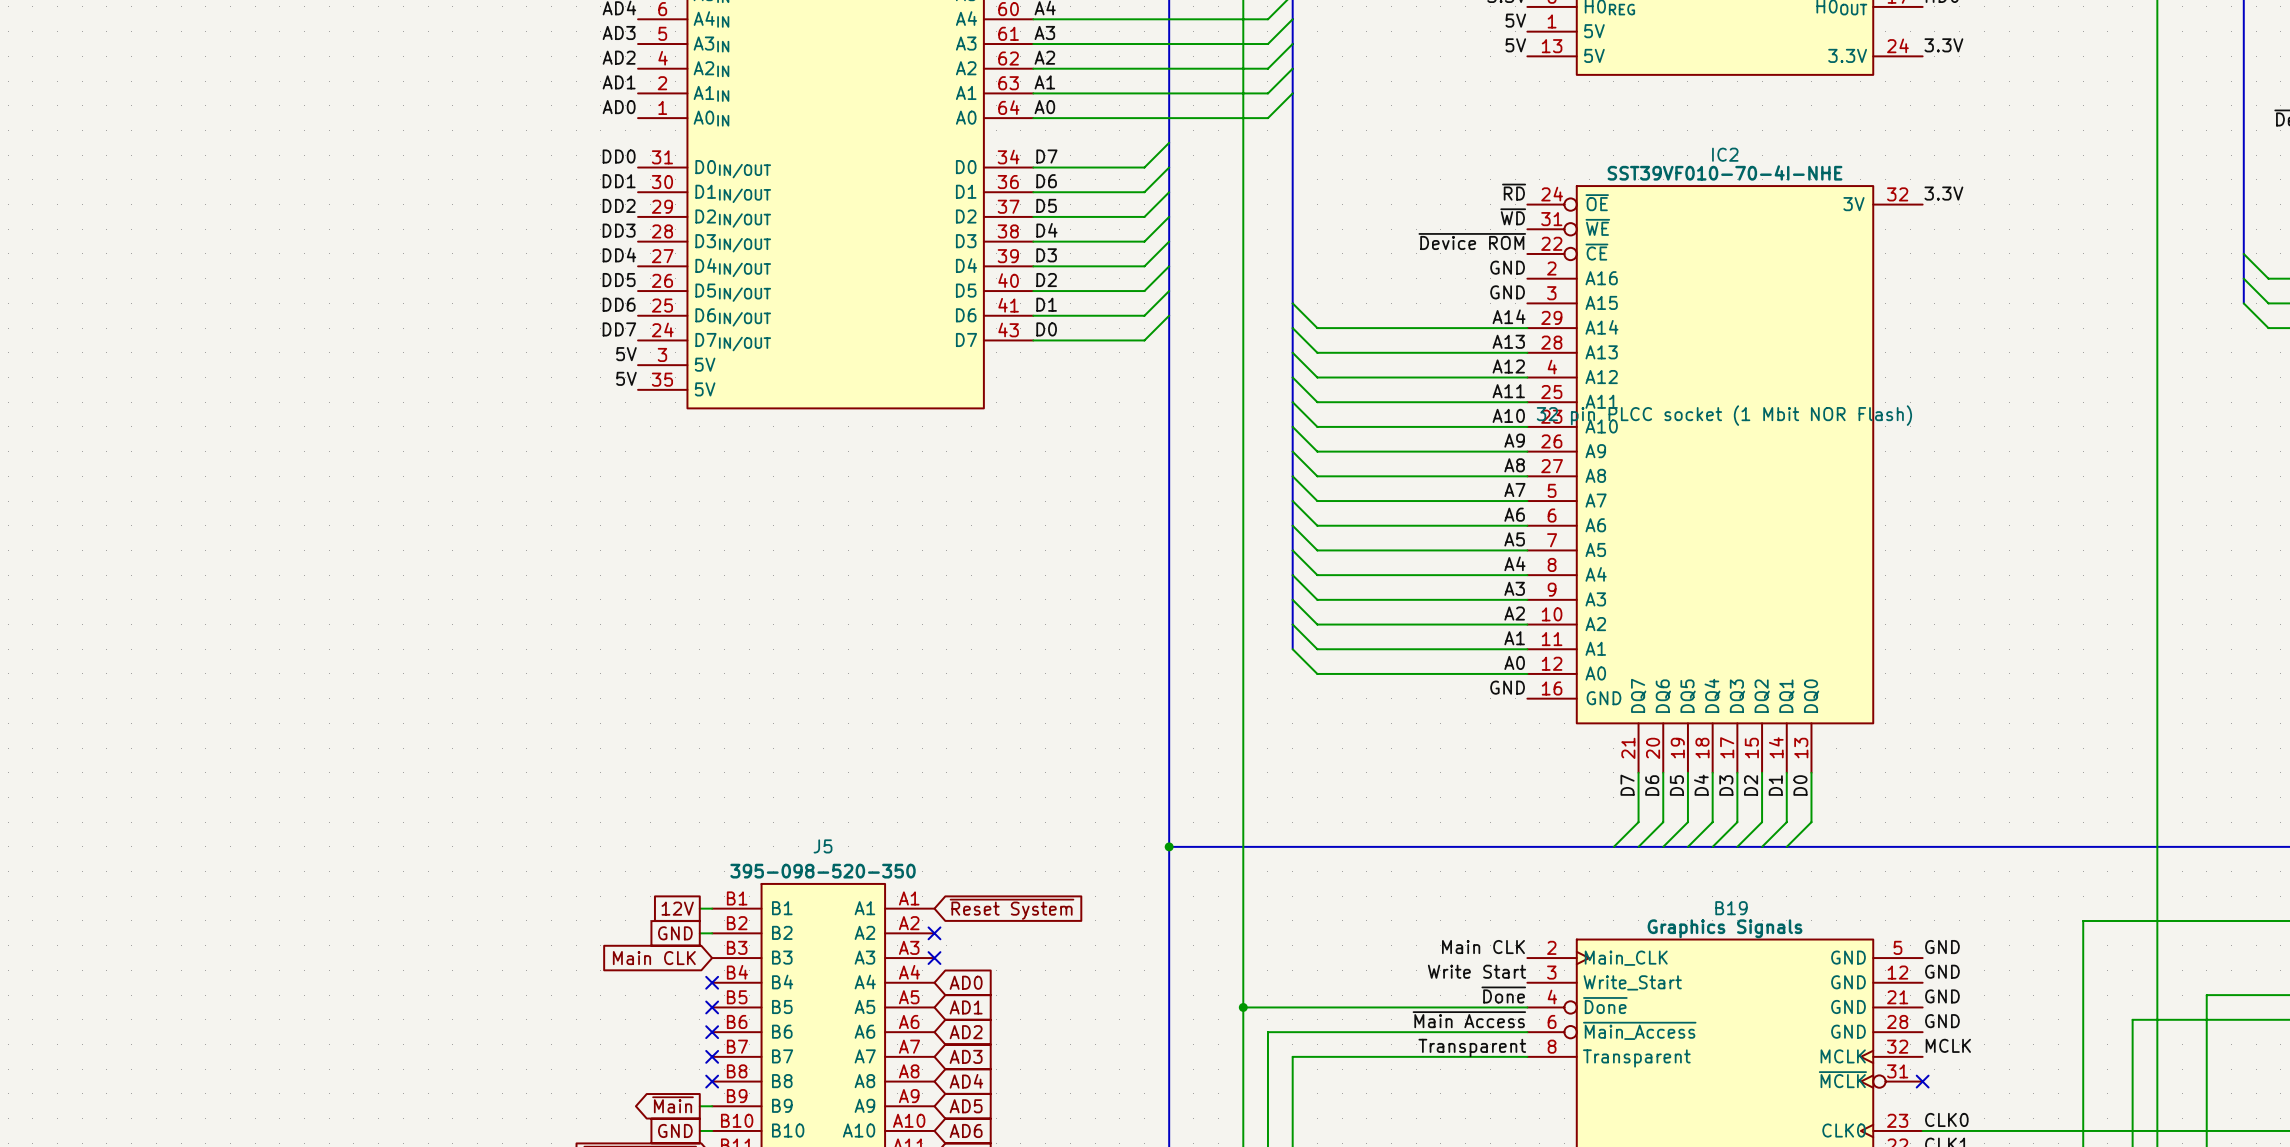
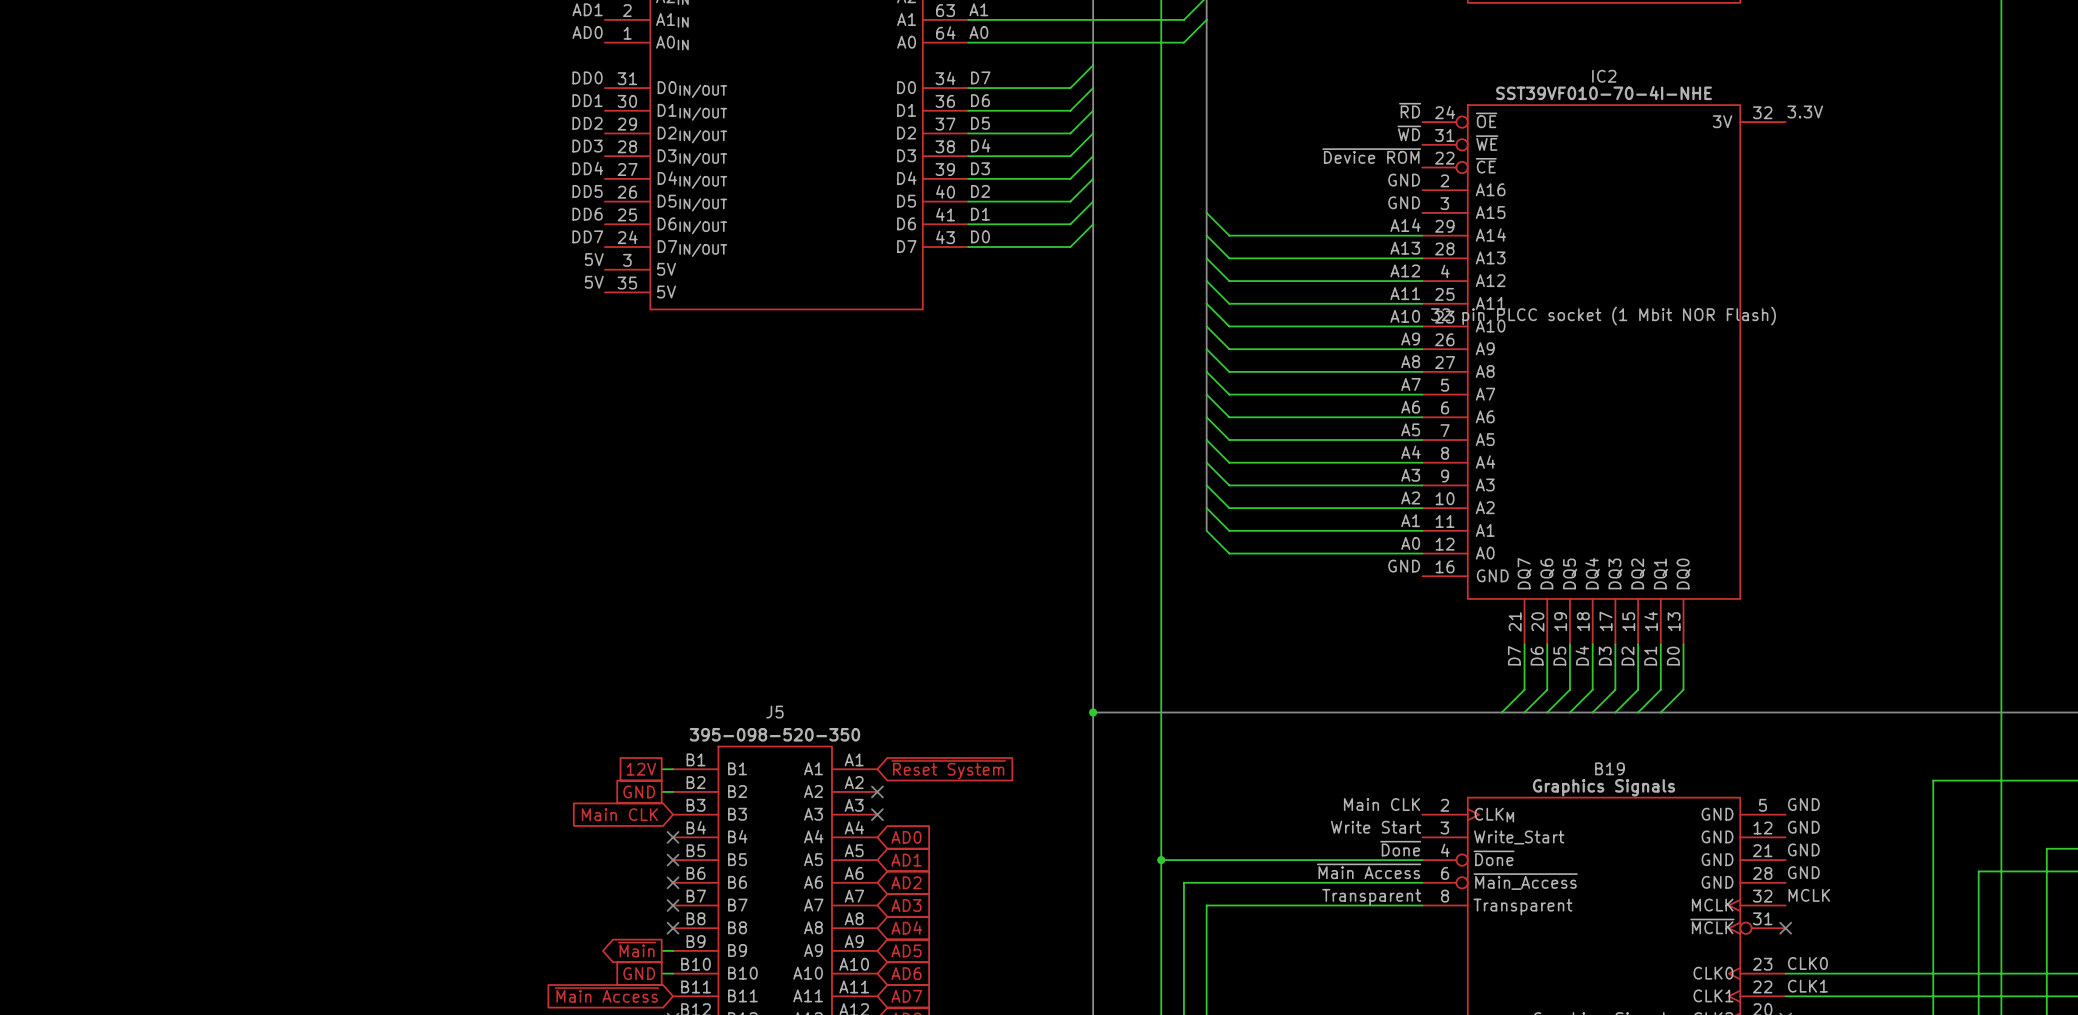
B19 pin name: Main_CLK (1626, 958) -> CLKM (1494, 815)

